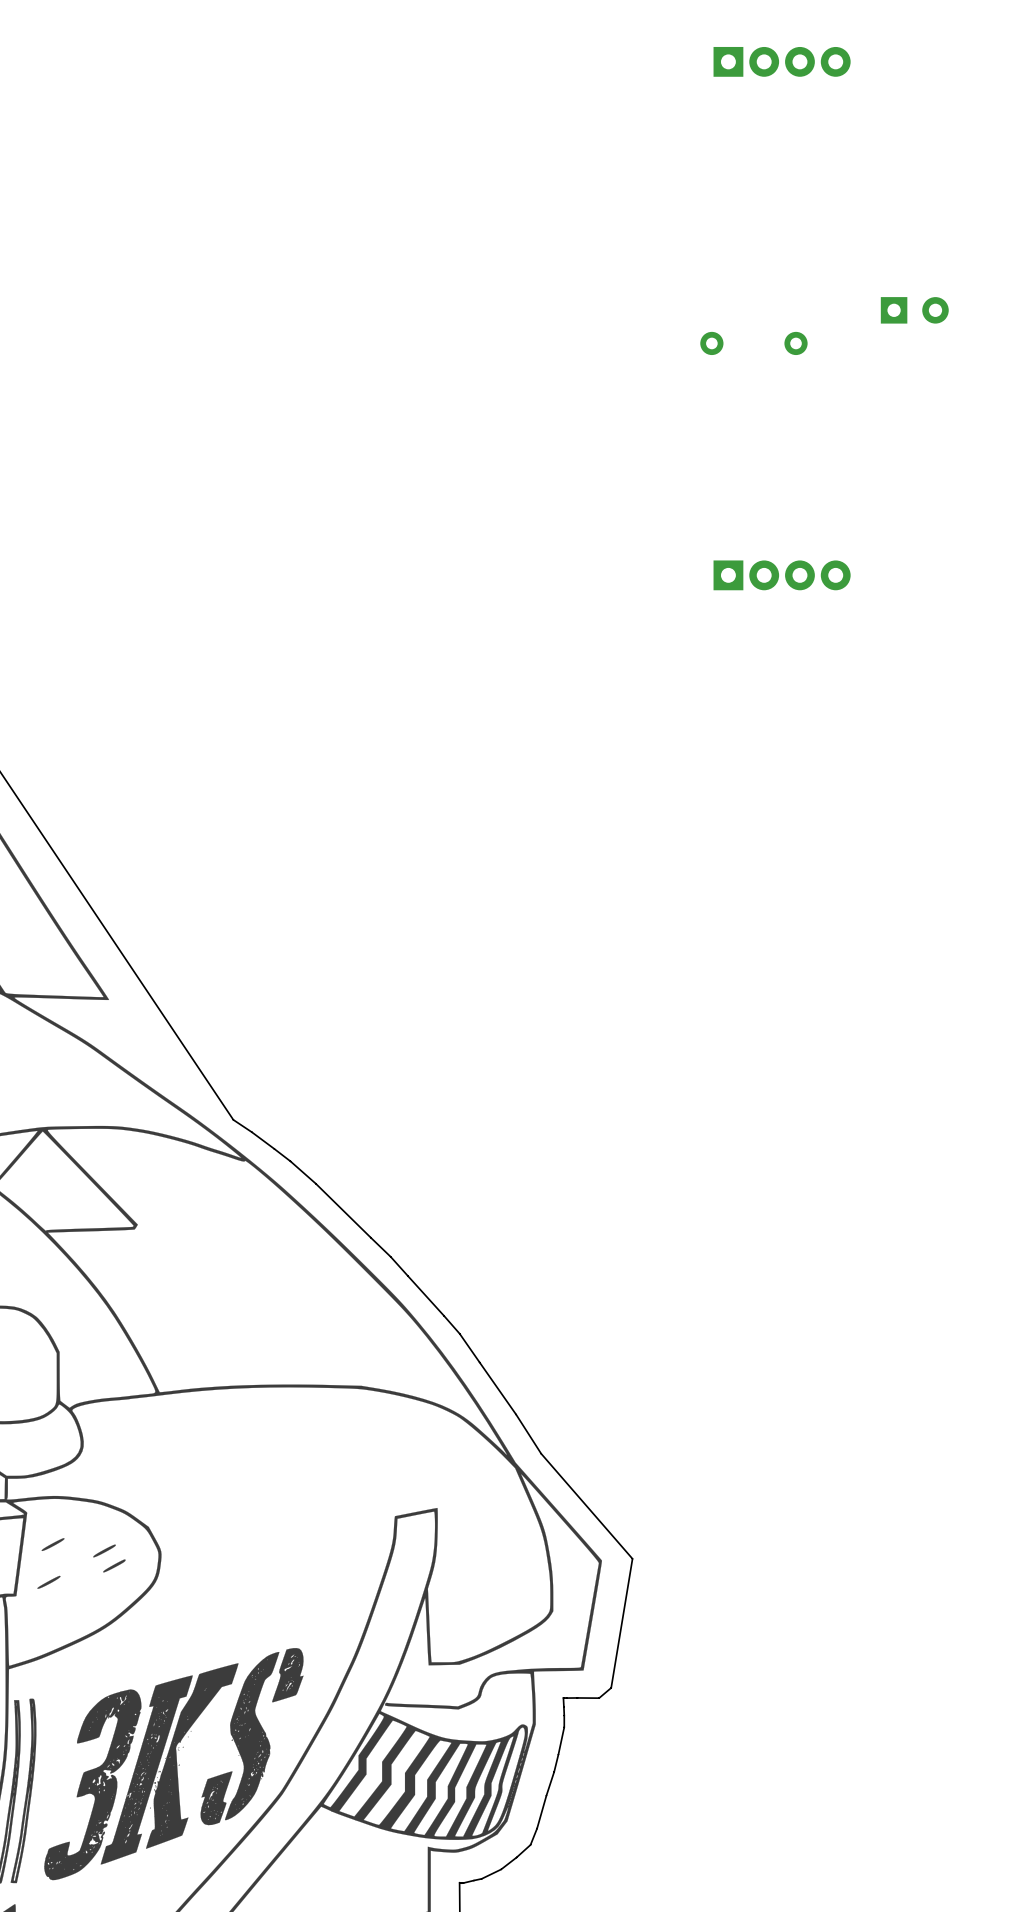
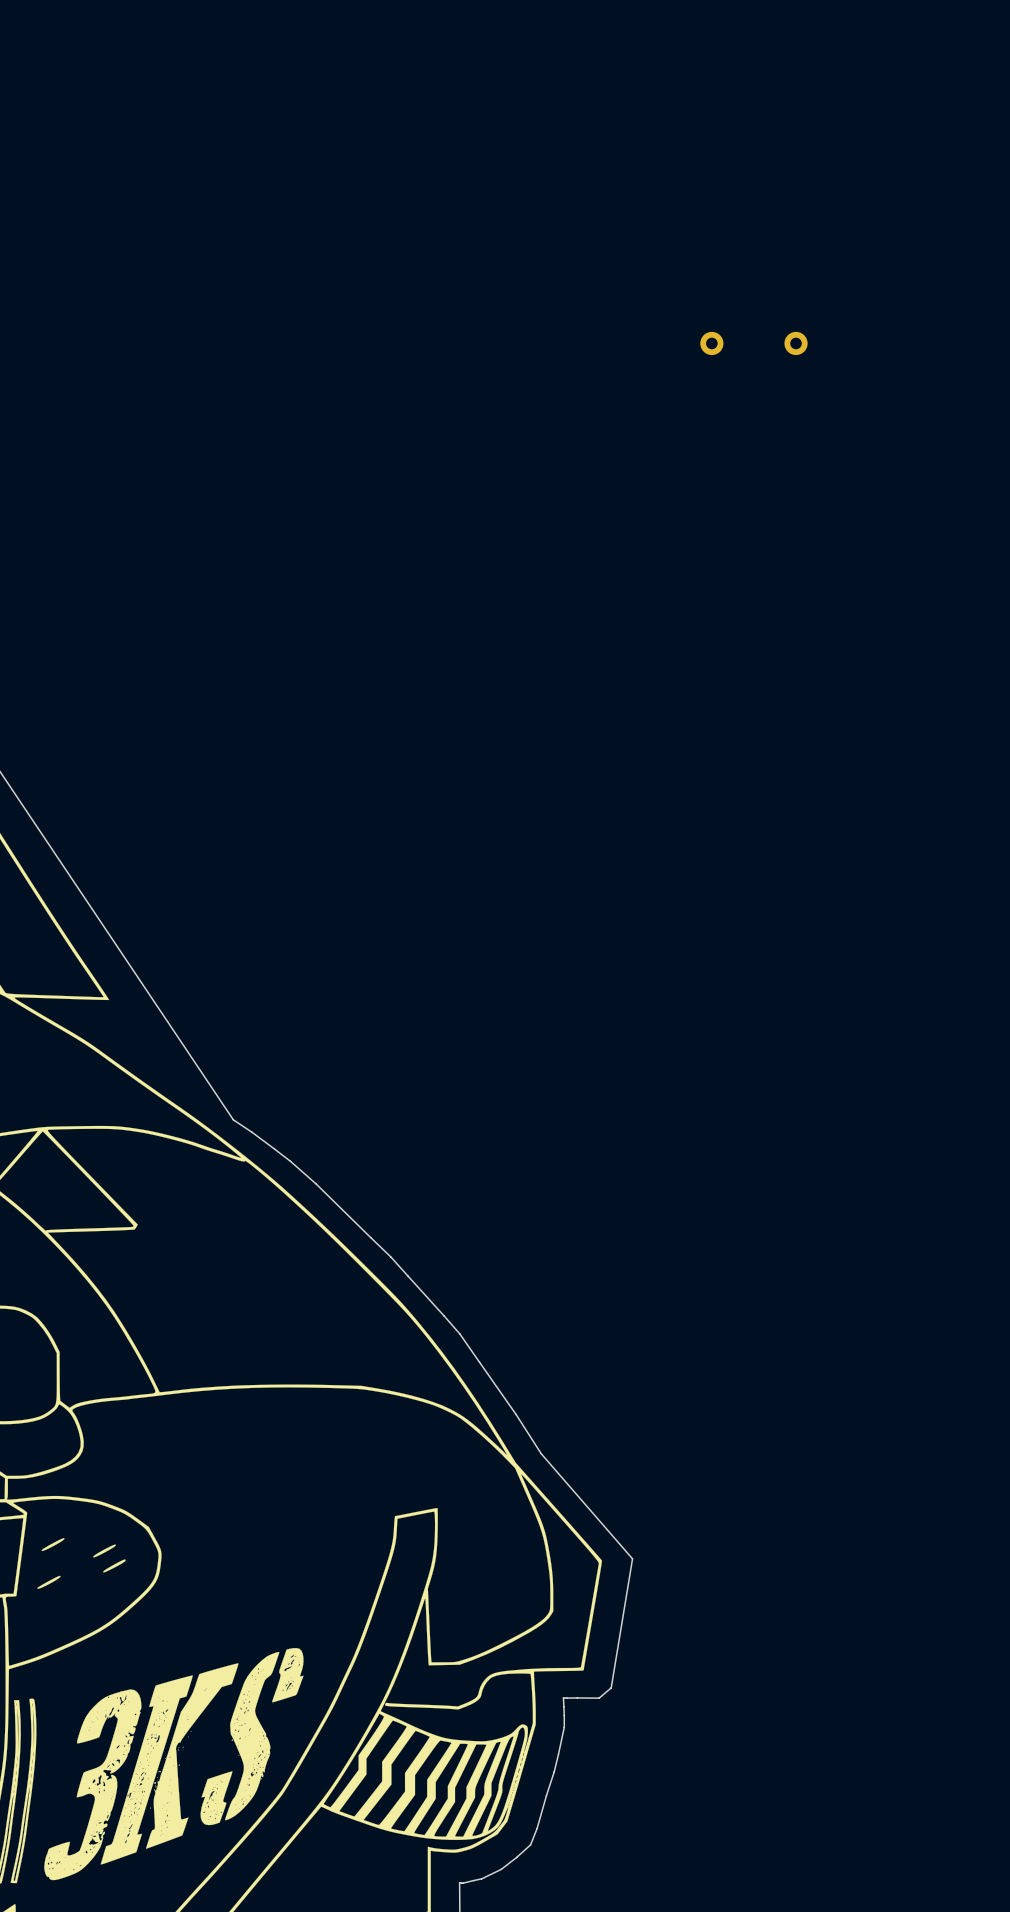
part: (782, 61) -> none
part: (914, 310) -> none
part: (782, 575) -> none

